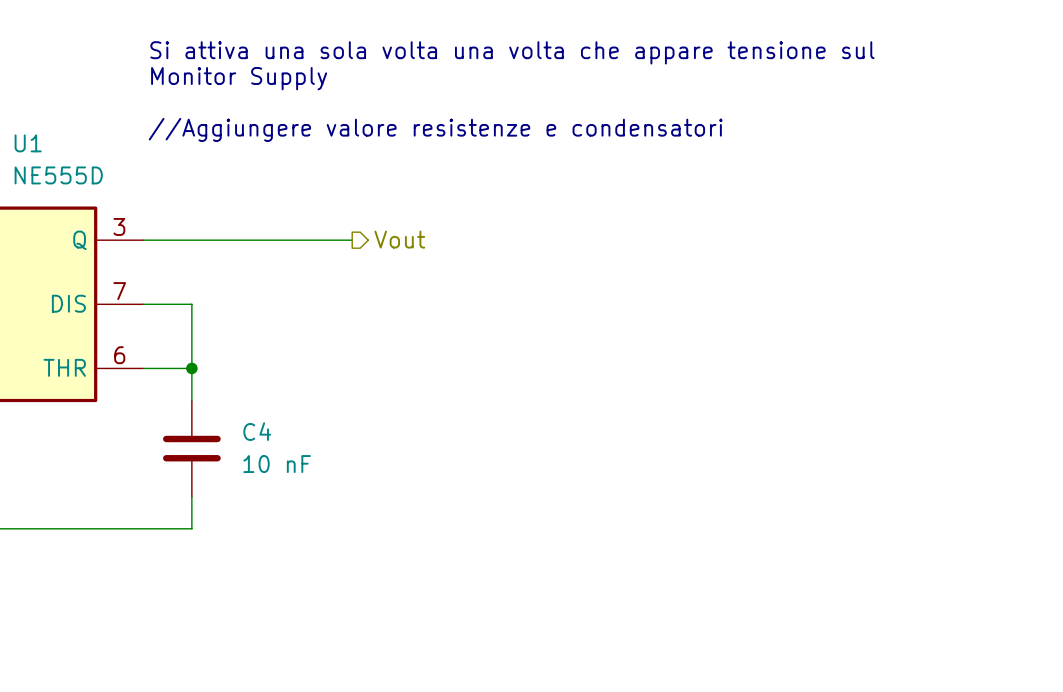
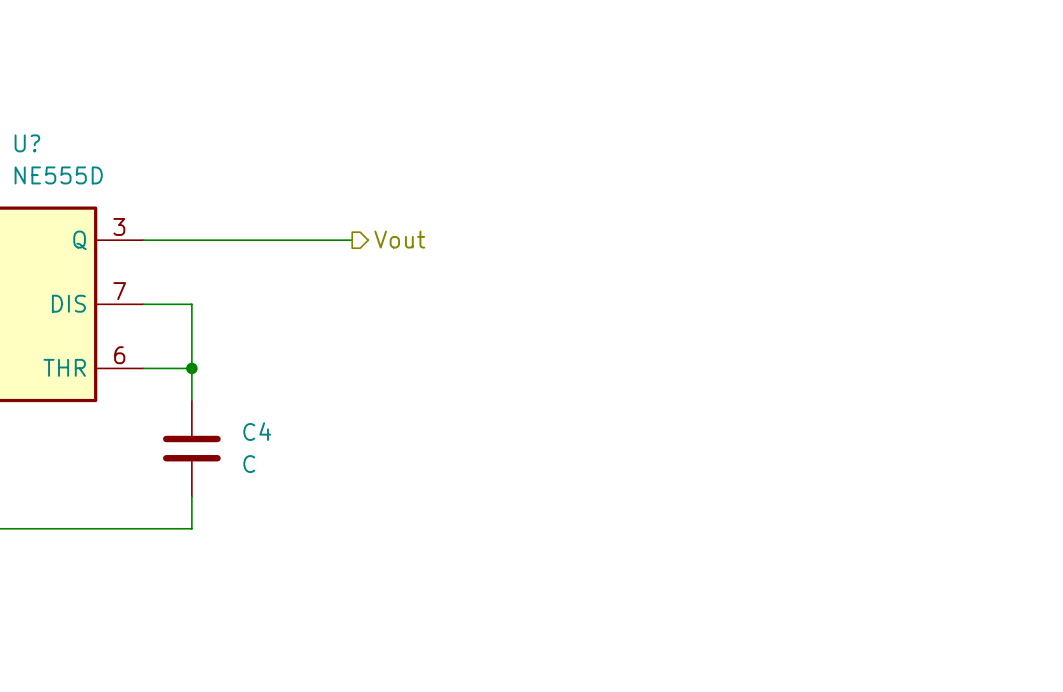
text: Si attiva una sola volta una volta che appare tensione sul (512, 52) -> none
text: Monitor Supply (239, 78) -> none
text: //Aggiungere valore resistenze e condensatori (435, 129) -> none
U1 name: U1 (28, 143) -> U? (27, 143)
C4 value: 10 nF (277, 464) -> C (249, 464)

